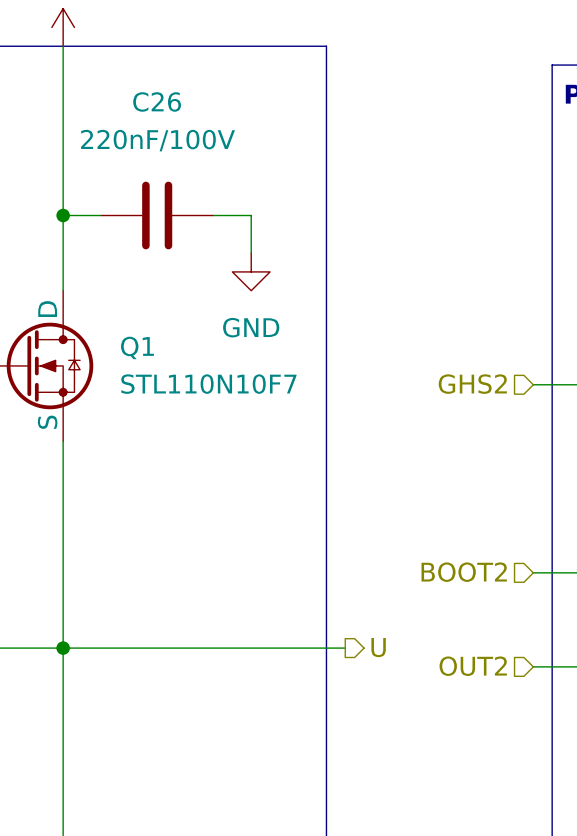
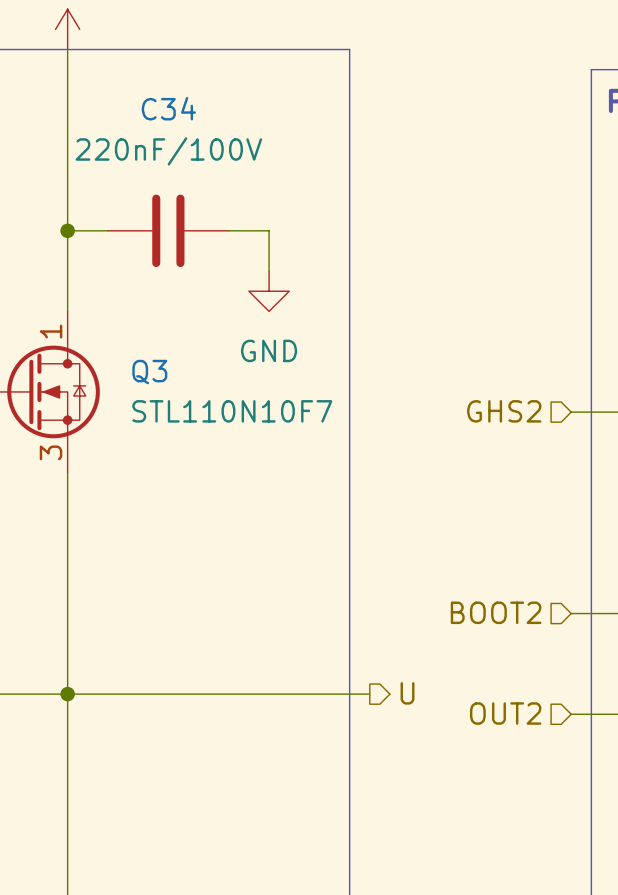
C26 name: C26 (157, 101) -> C34 (168, 108)
Q1 pin name: D (47, 309) -> none
Q1 pin number: none -> 1 (51, 331)
Q1 name: Q1 (137, 347) -> Q3 (149, 372)
Q1 pin name: S (47, 422) -> none
Q1 pin number: none -> 3 (51, 452)

